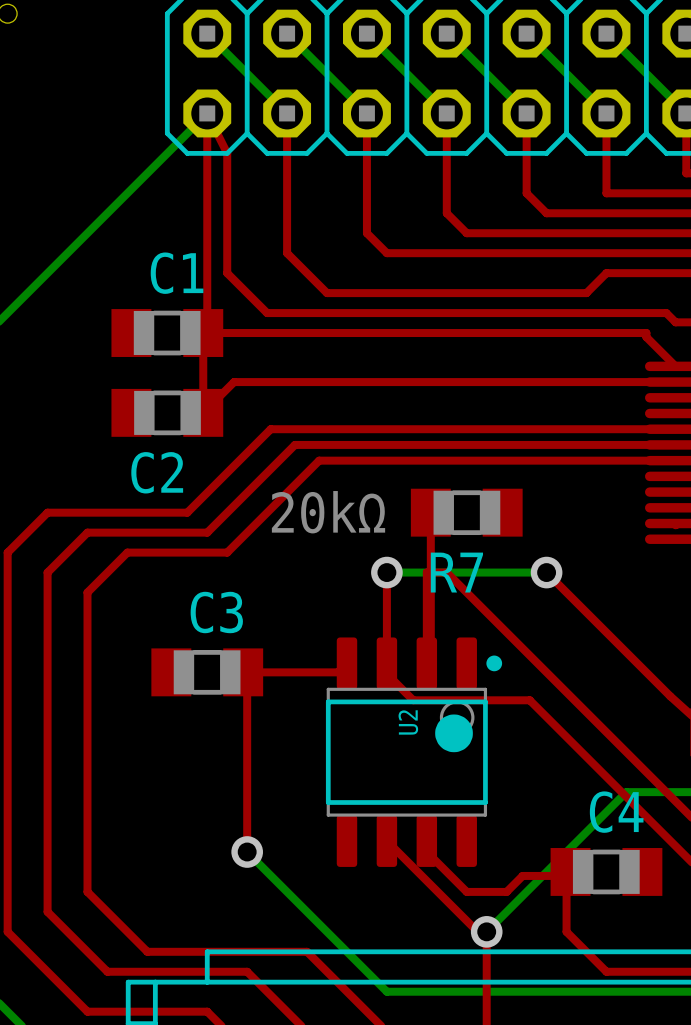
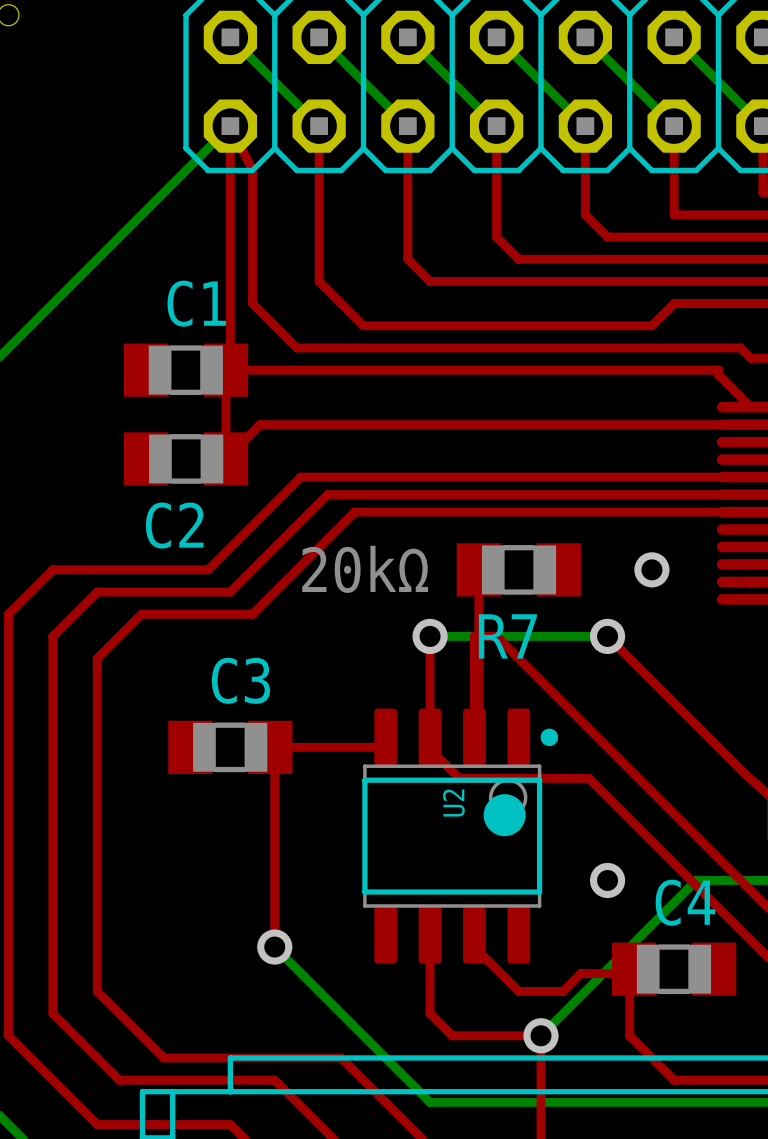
via: none -> (651, 569)
via: none -> (607, 880)
top track: (386, 841) (477, 931) -> (430, 934) (430, 1013) (452, 1035) (531, 1035)

